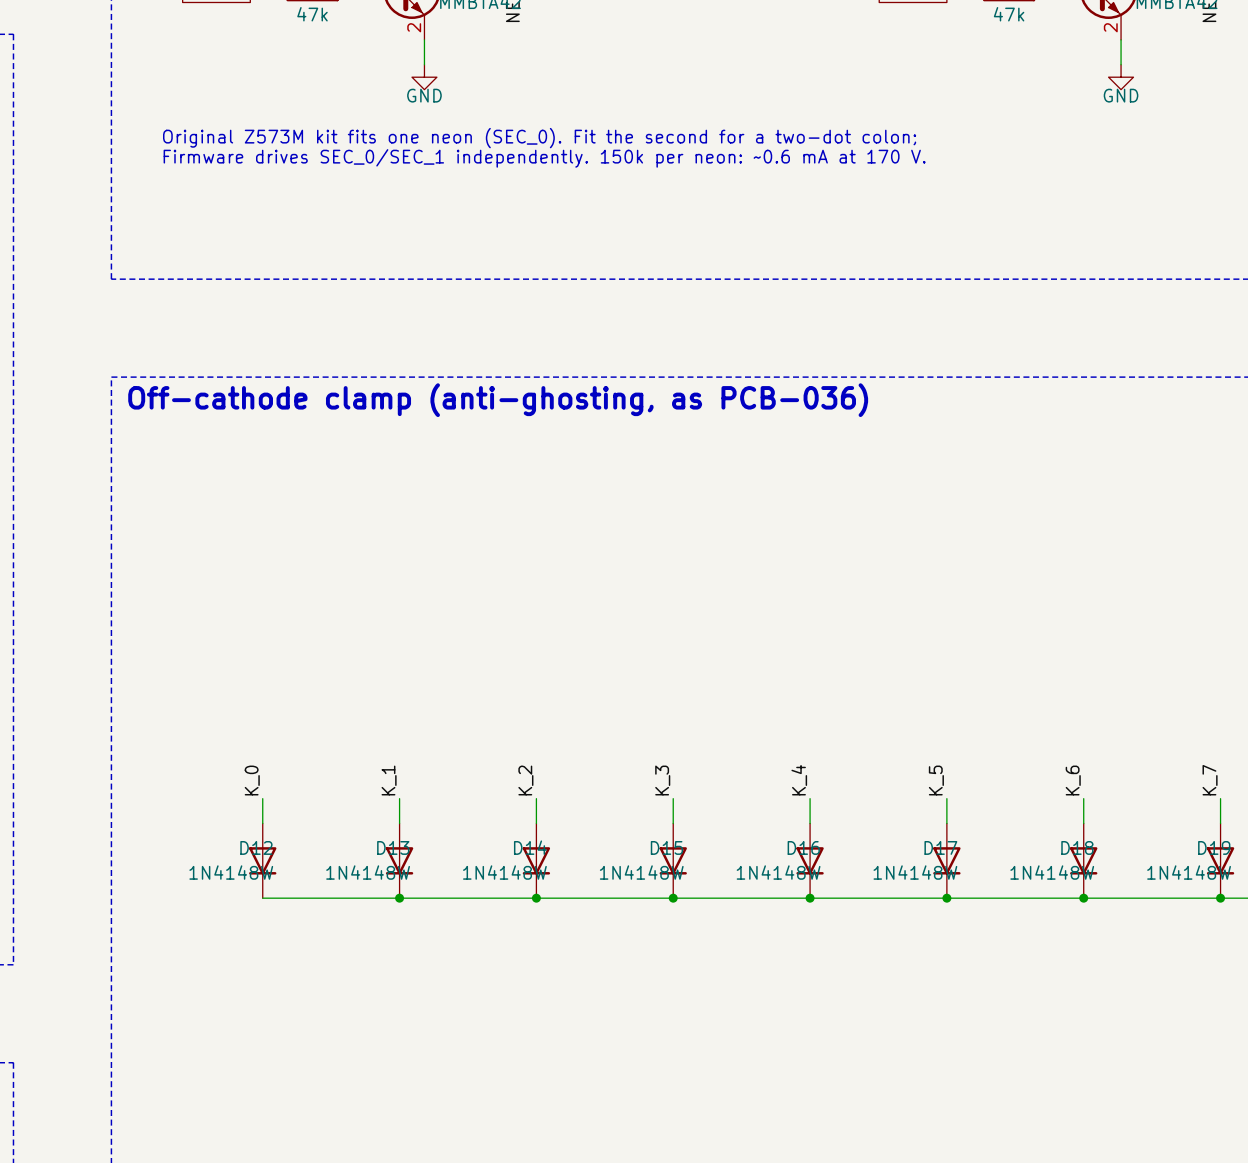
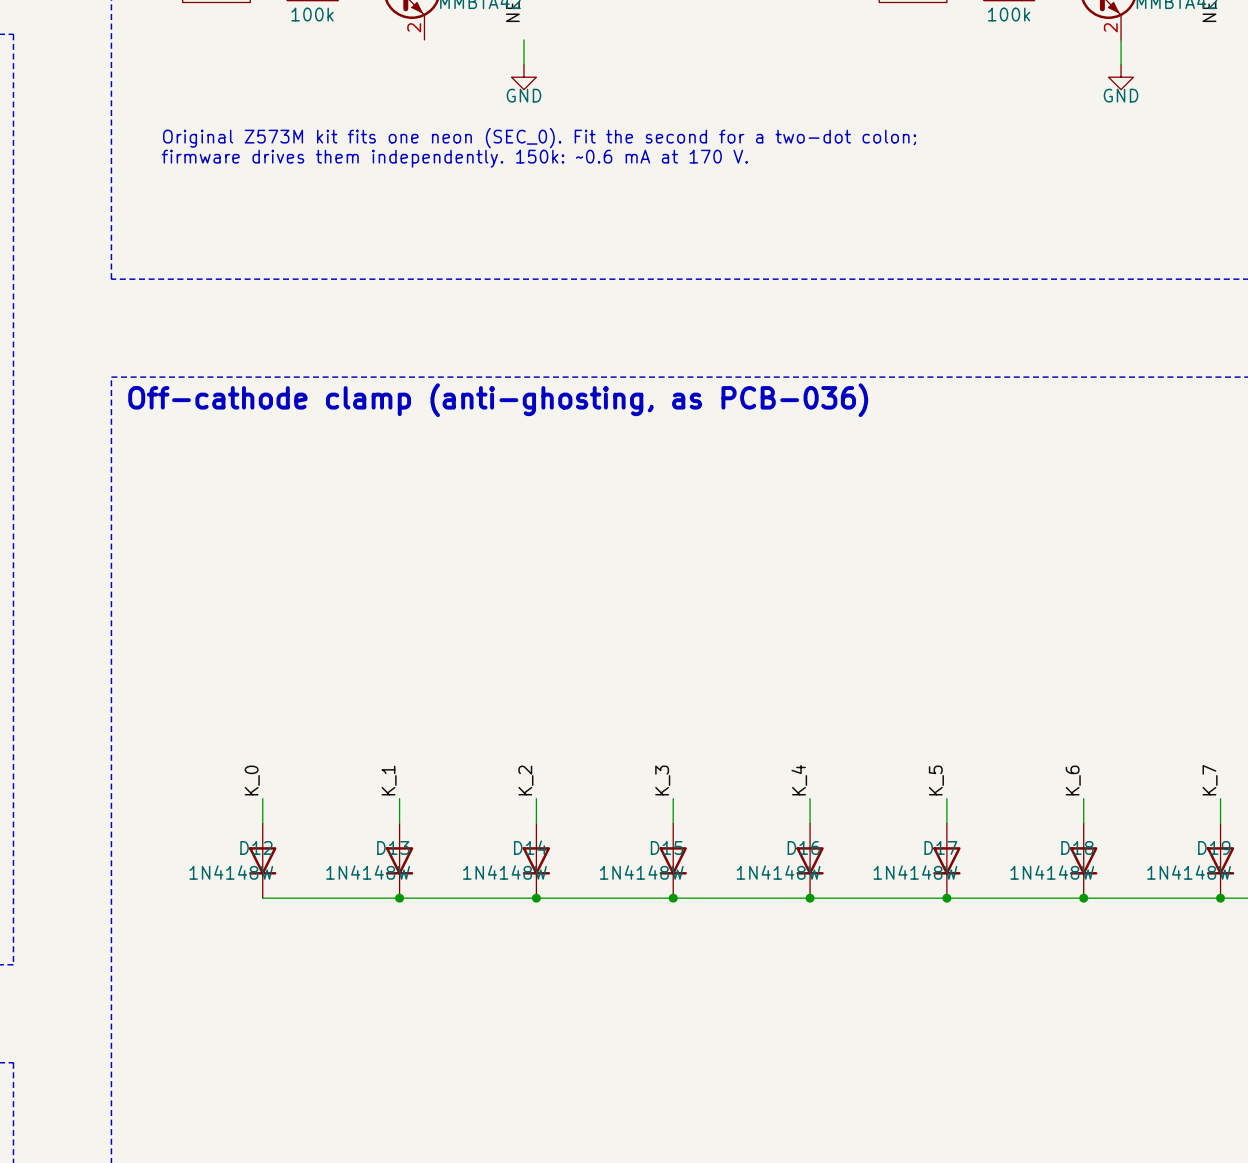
part value: 47k (312, 14) -> 100k (312, 14)
part value: 47k (1009, 14) -> 100k (1009, 14)
wire: (424, 39) (424, 64) -> (523, 39) (523, 64)
power symbol position: GND (424, 77) -> GND (523, 77)
text: Firmware drives SEC_0/SEC_1 independently. 150k per neon: ~0.6 mA at 170 V. (544, 158) -> firmware drives them independently. 150k: ~0.6 mA at 170 V. (454, 158)

